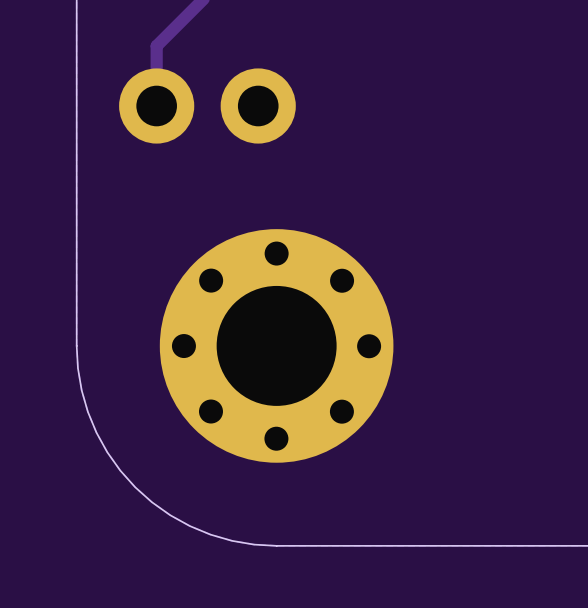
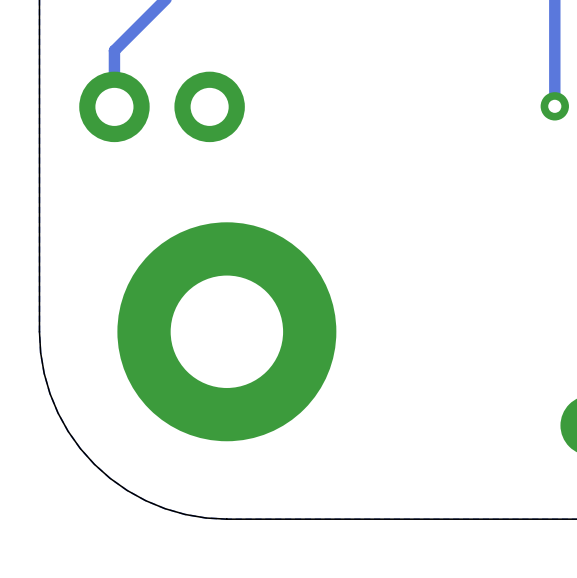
part footprint: [159, 229, 394, 463] -> [117, 222, 337, 442]

